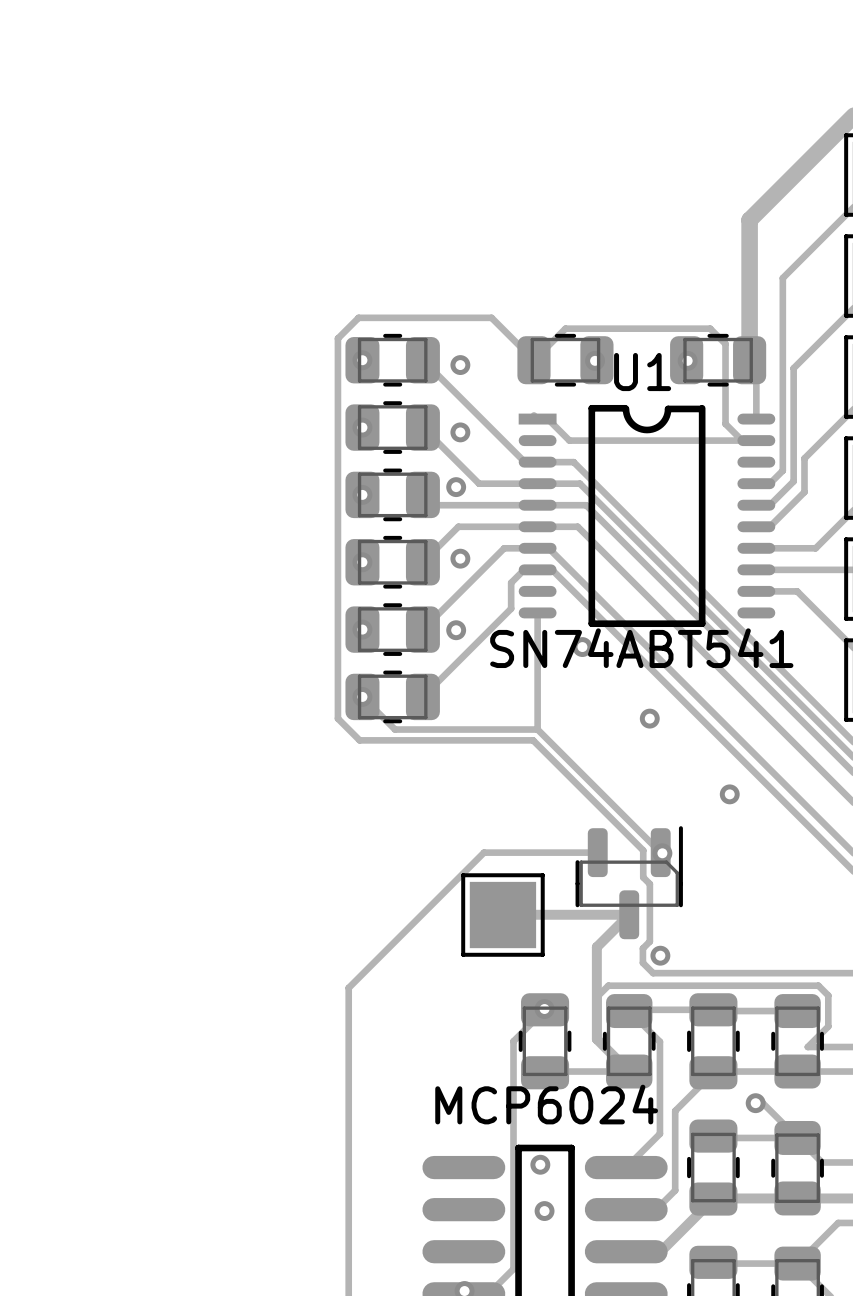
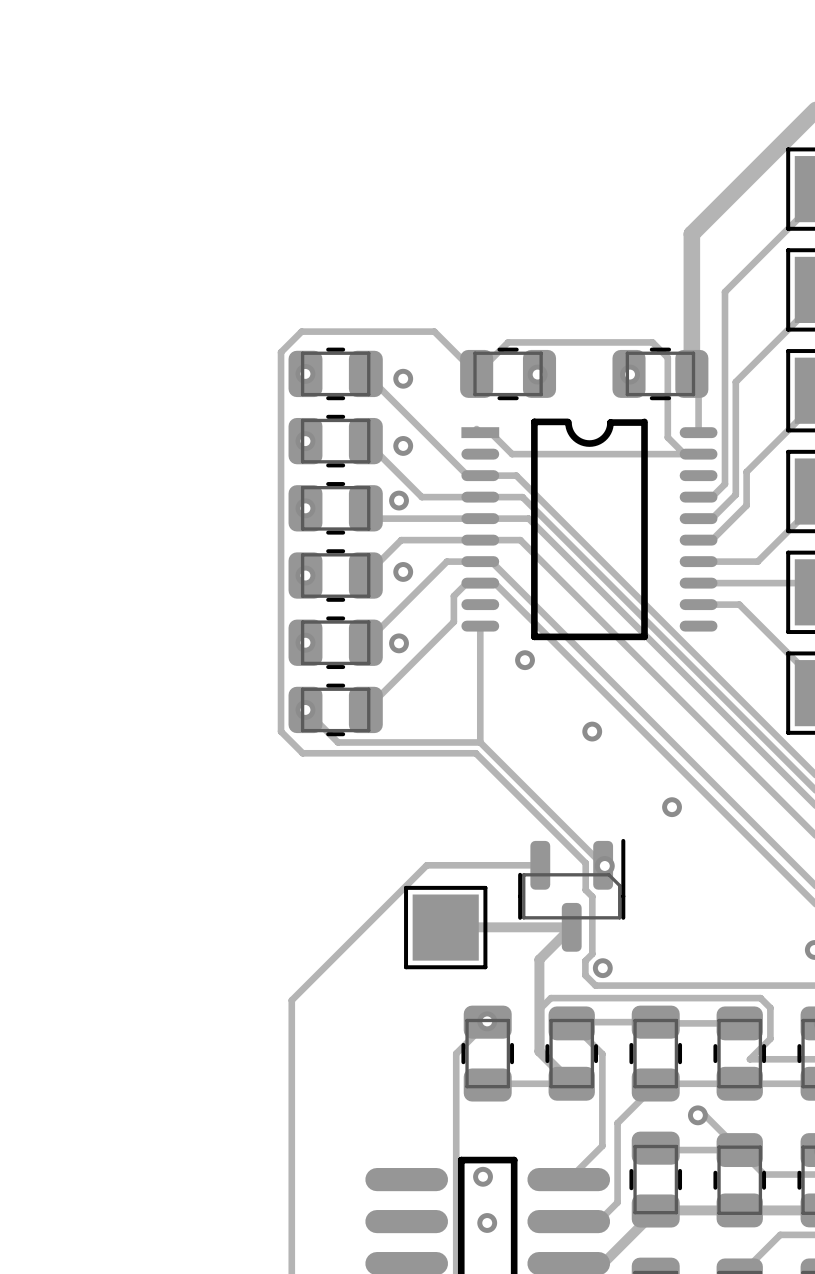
U1 name: U1 (642, 372) -> none
U1 value: SN74ABT541 (641, 648) -> none
part value: MCP6024 (546, 1104) -> none

